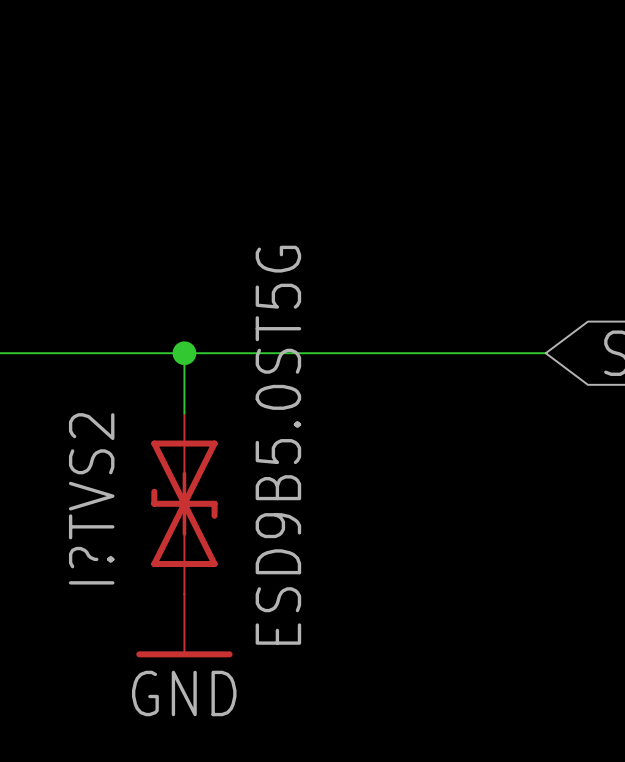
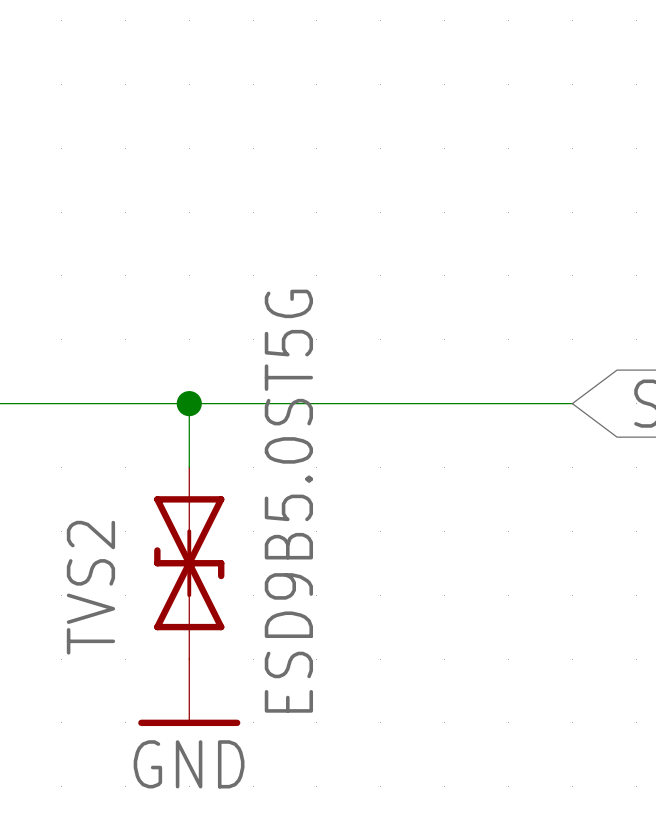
I?TVS2 name: I?TVS2 (91, 498) -> TVS2 (90, 587)

